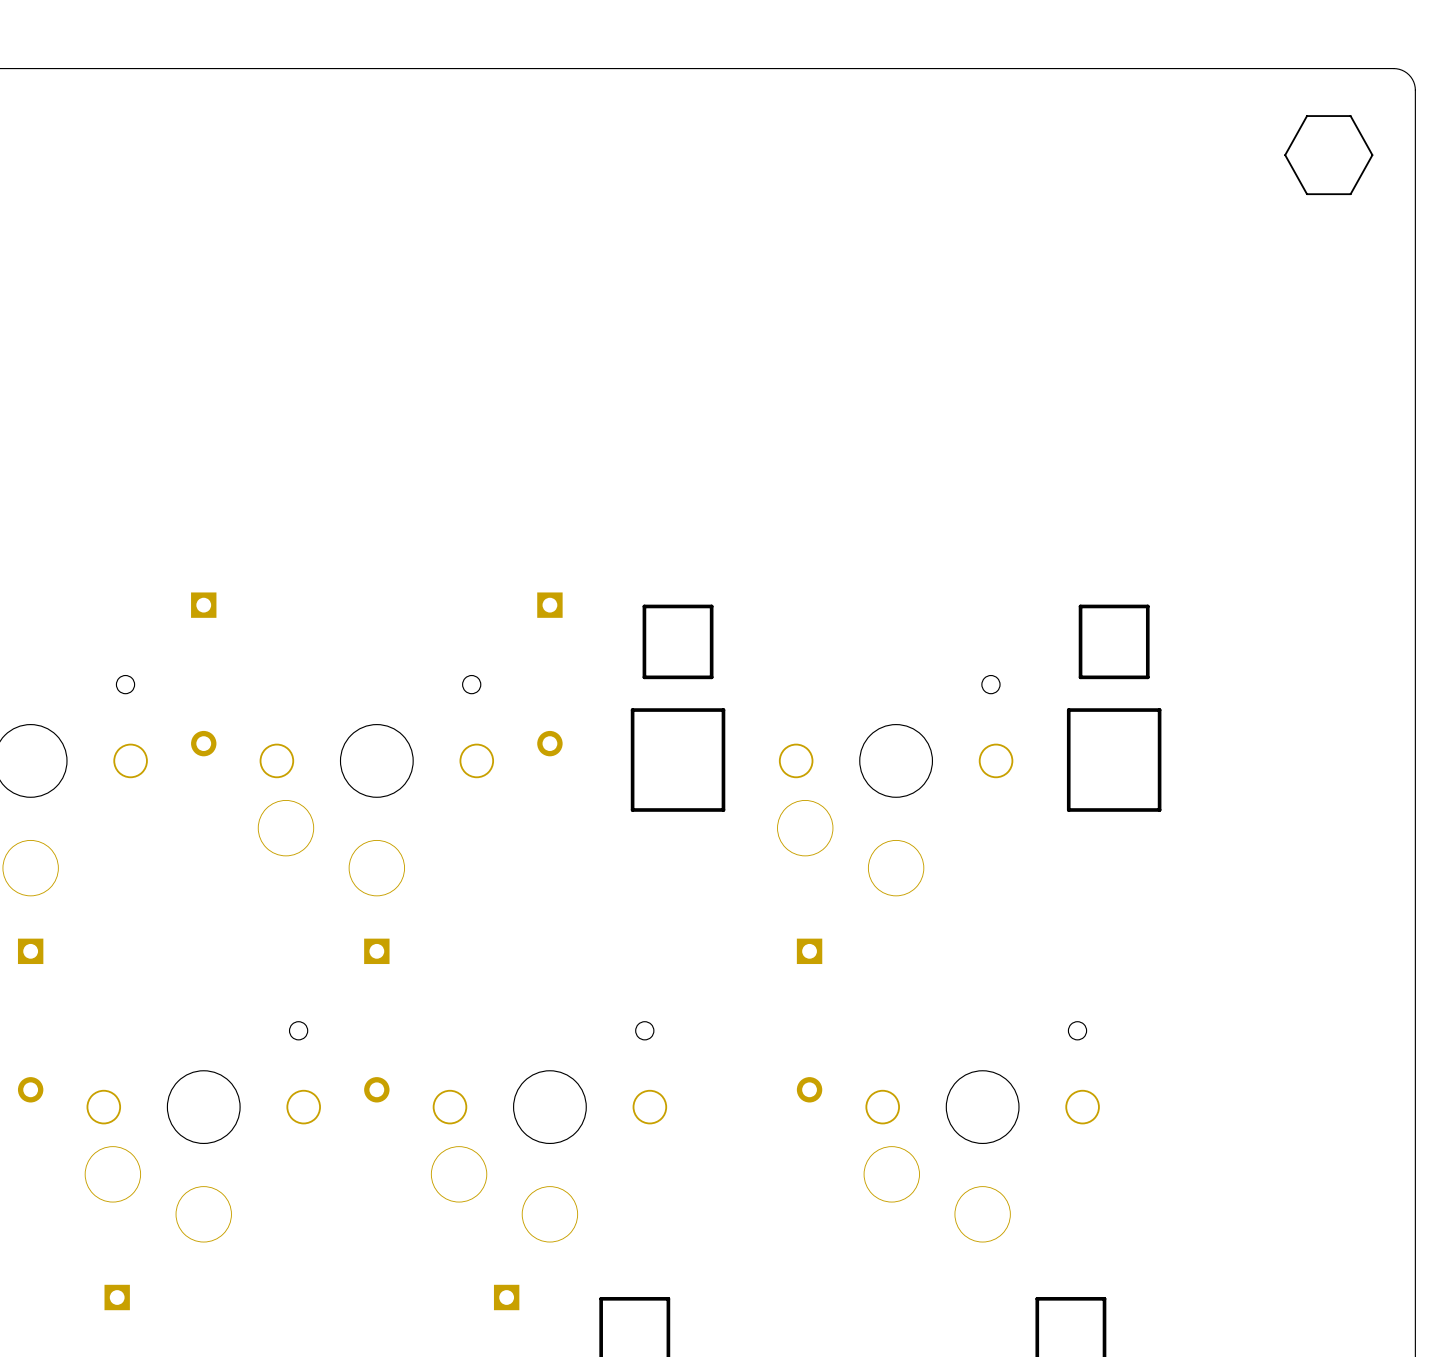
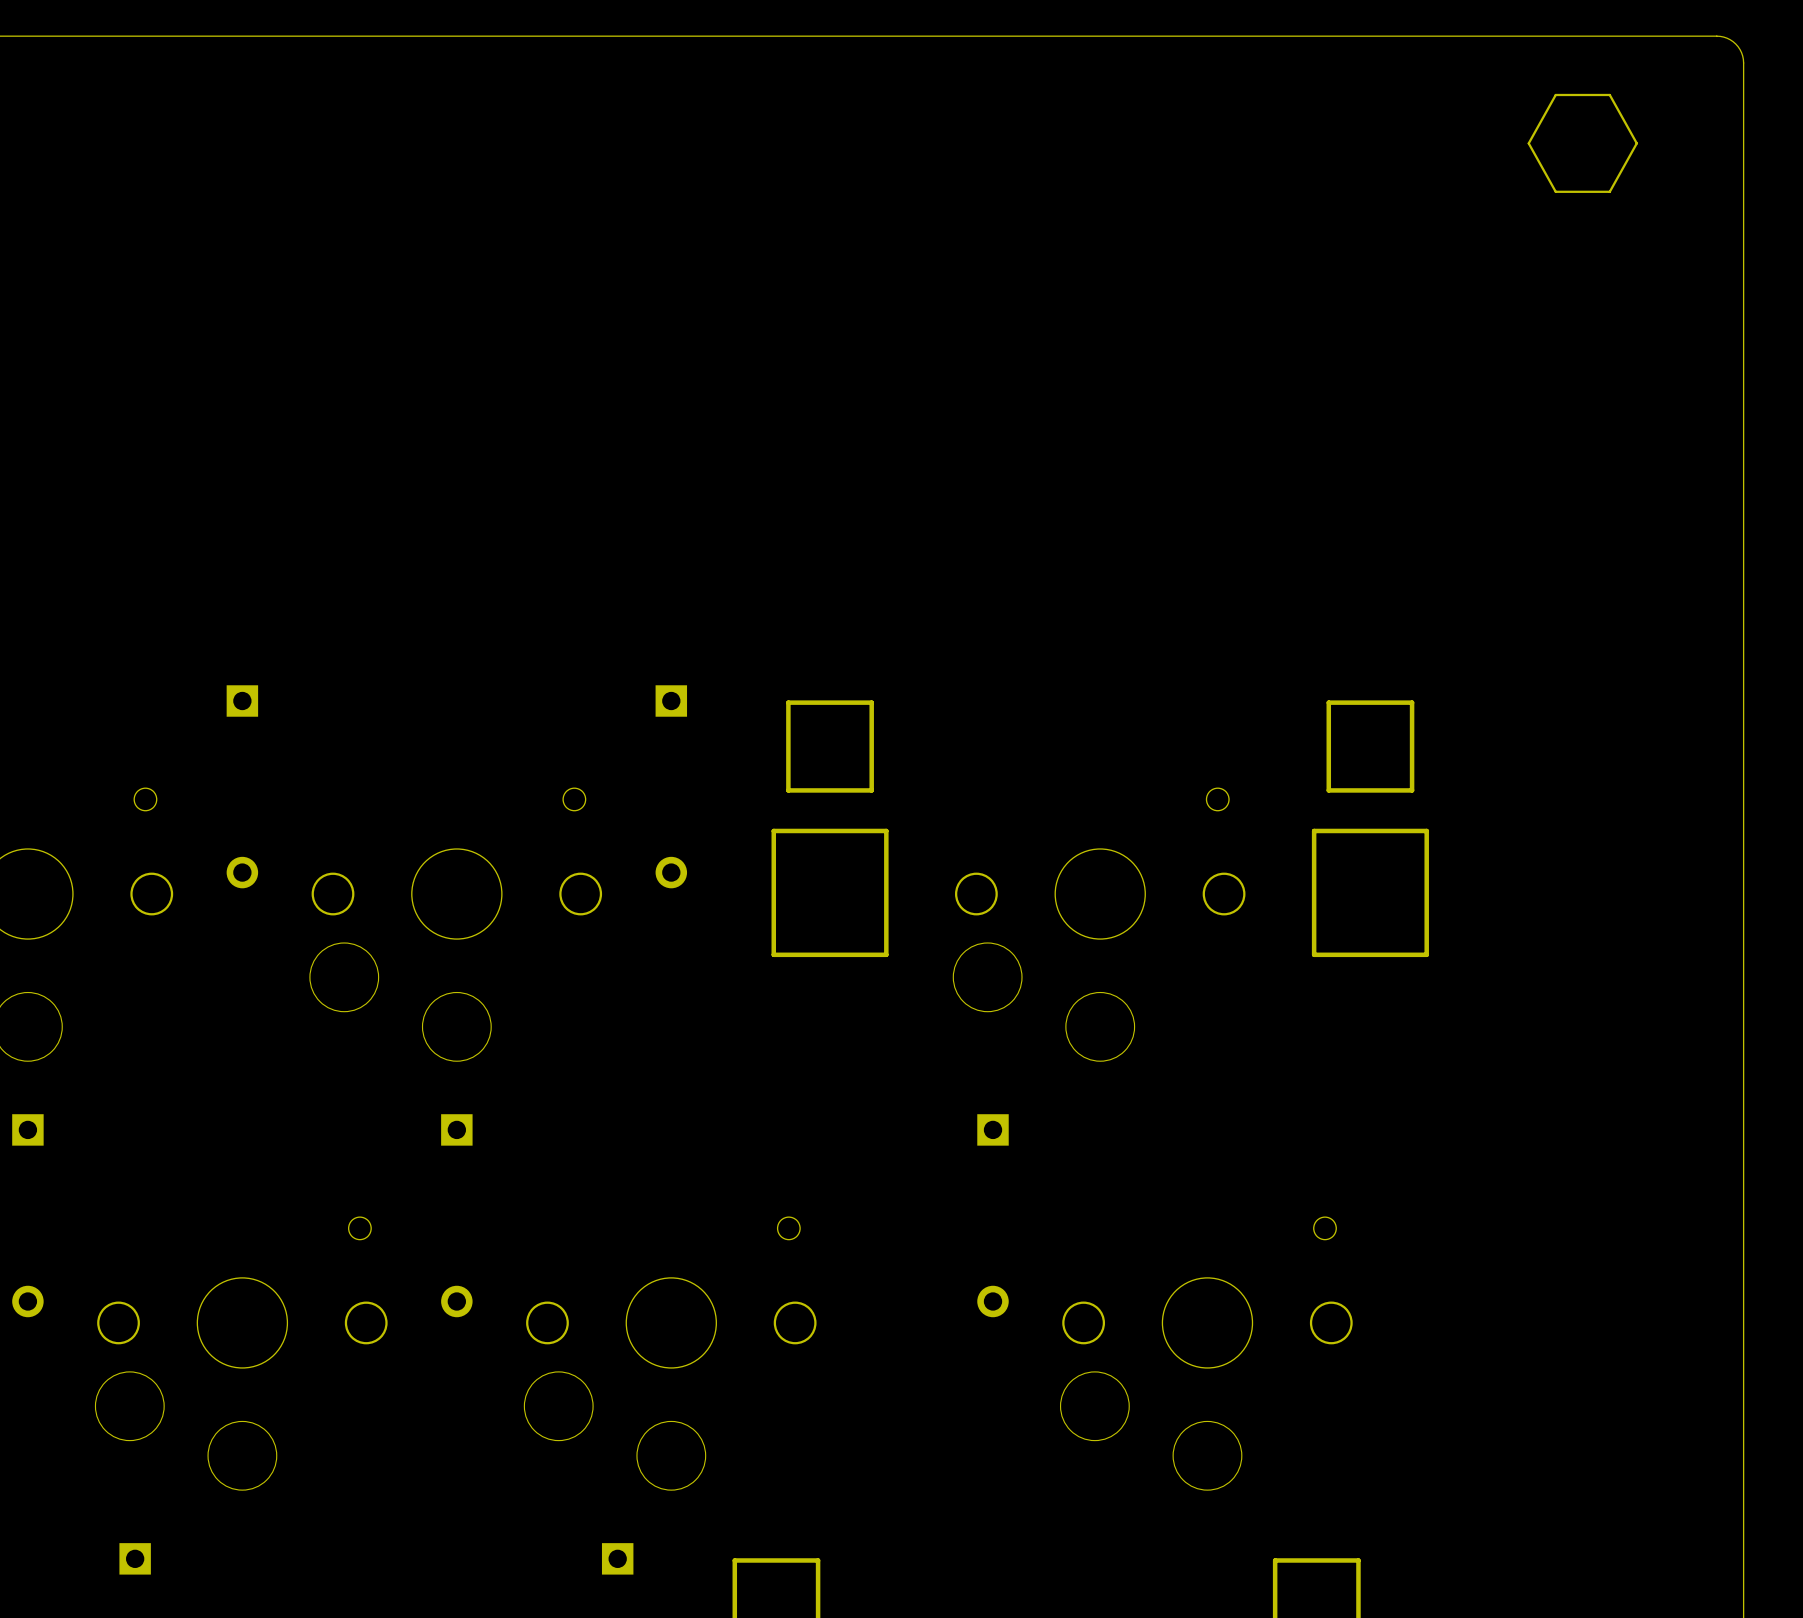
drawing position: (1328, 155) -> (1582, 143)

